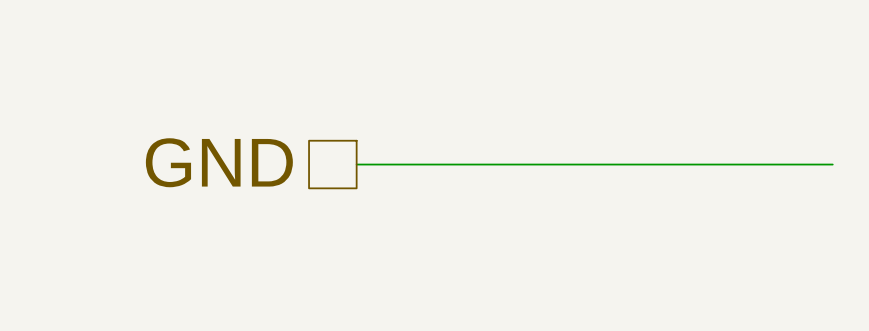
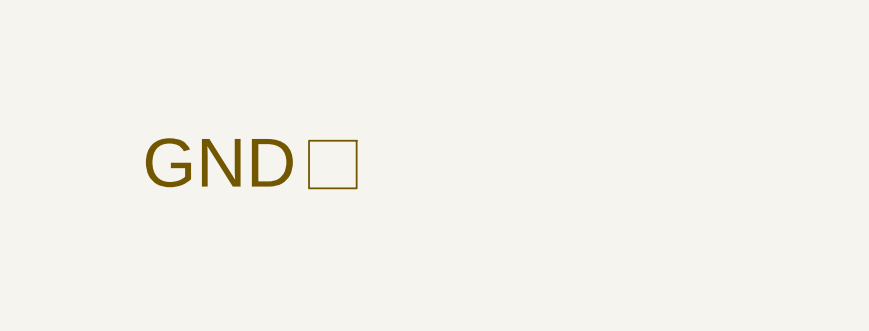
wire: (356, 164) (832, 164) -> none

